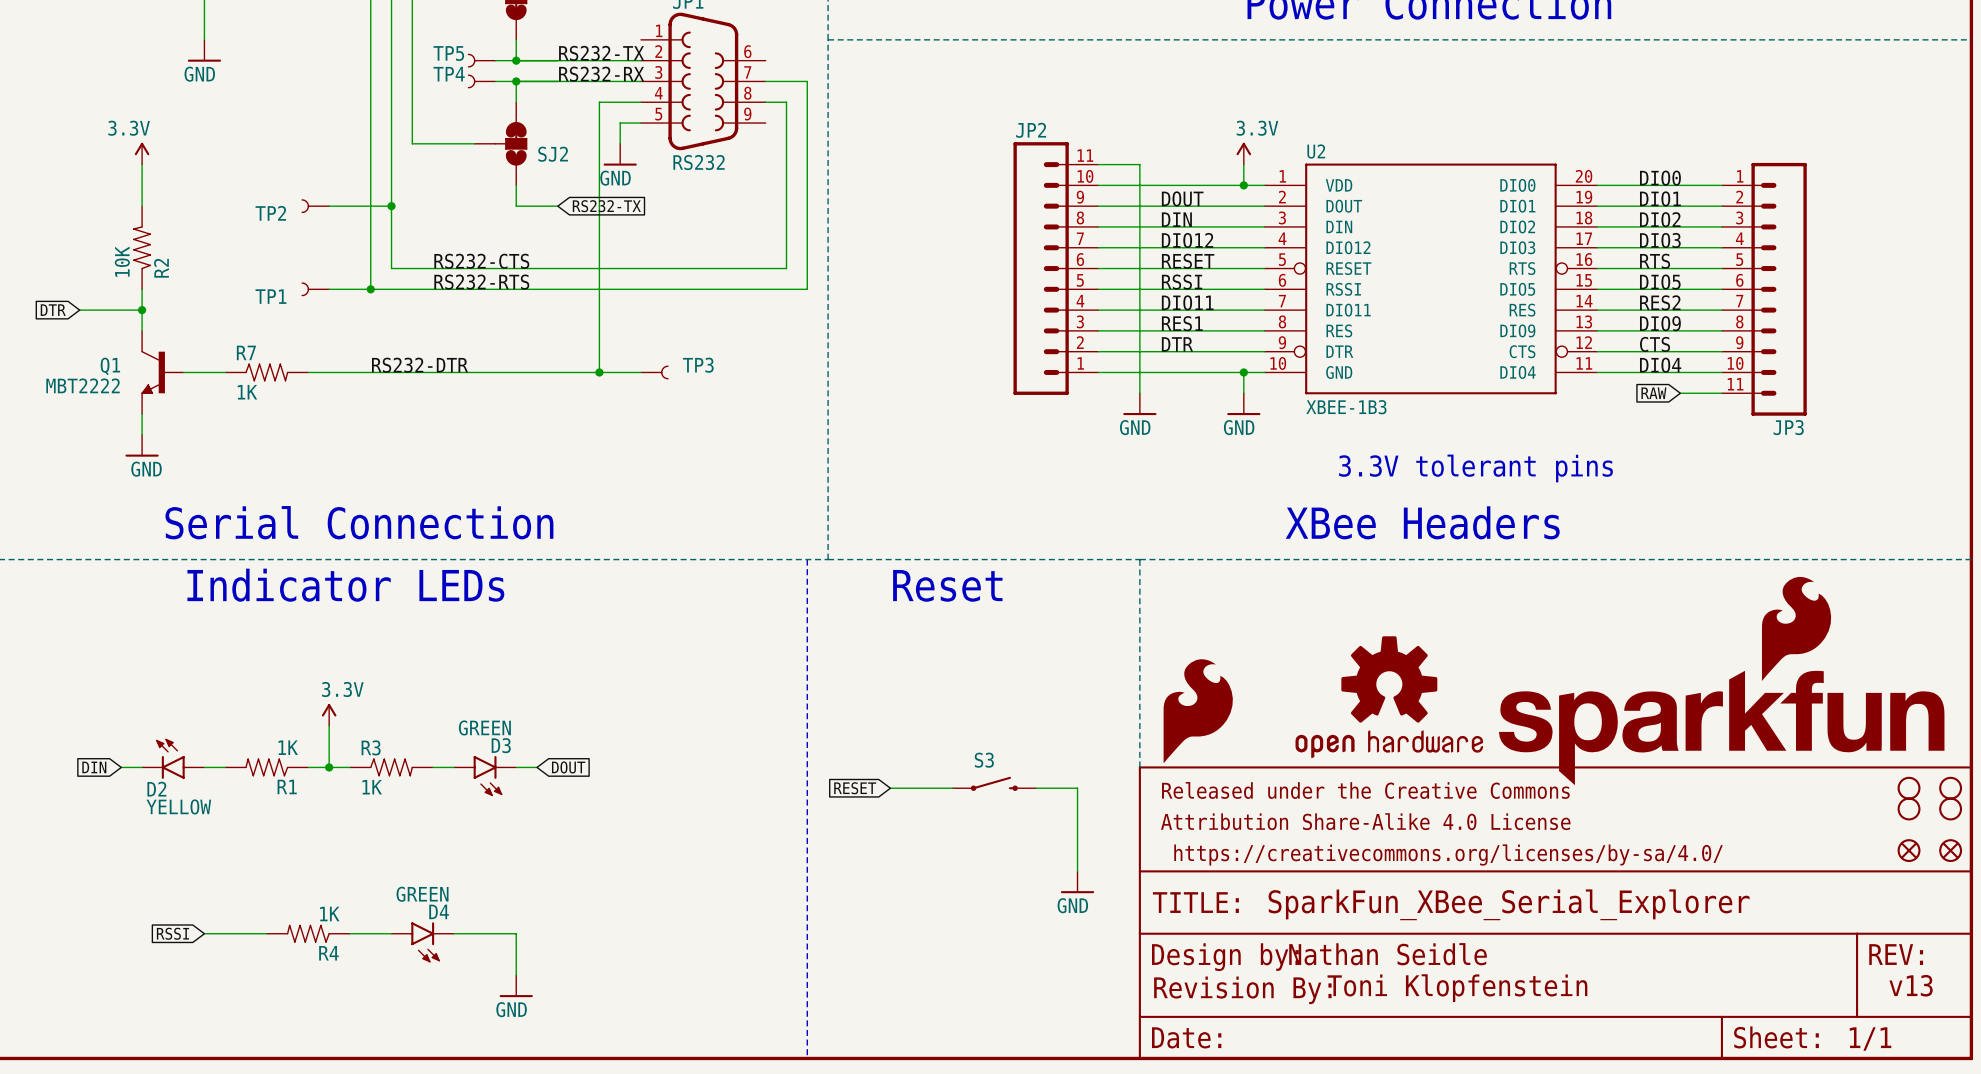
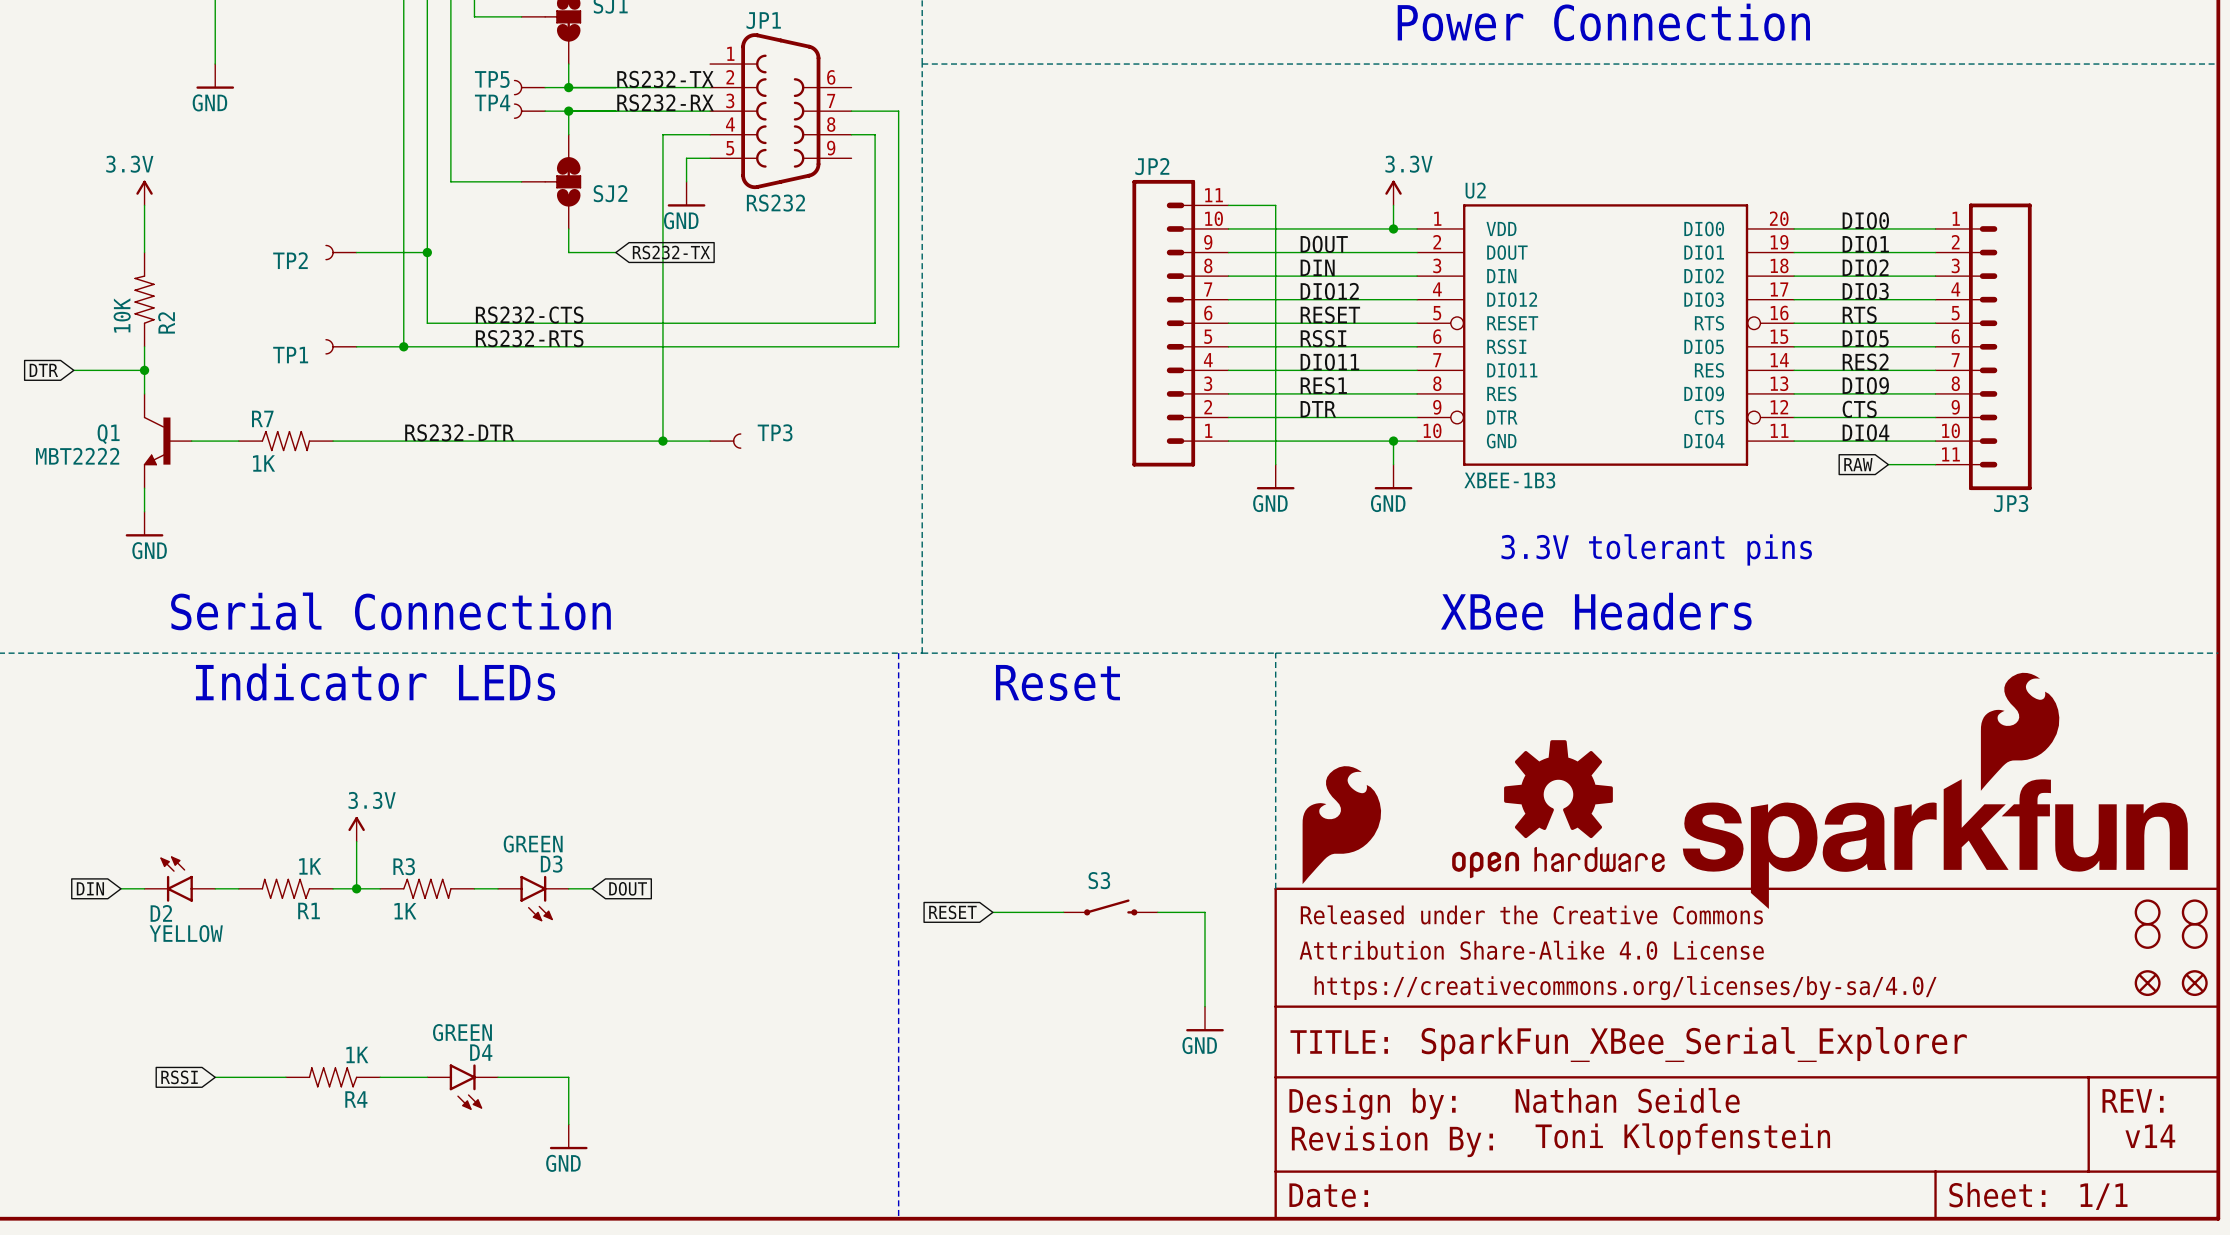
text position: Nathan Seidle (1388, 954) -> Nathan Seidle (1627, 1100)
text: v13 (1911, 985) -> v14 (2150, 1136)
text position: Toni Klopfenstein (1457, 988) -> Toni Klopfenstein (1682, 1139)

